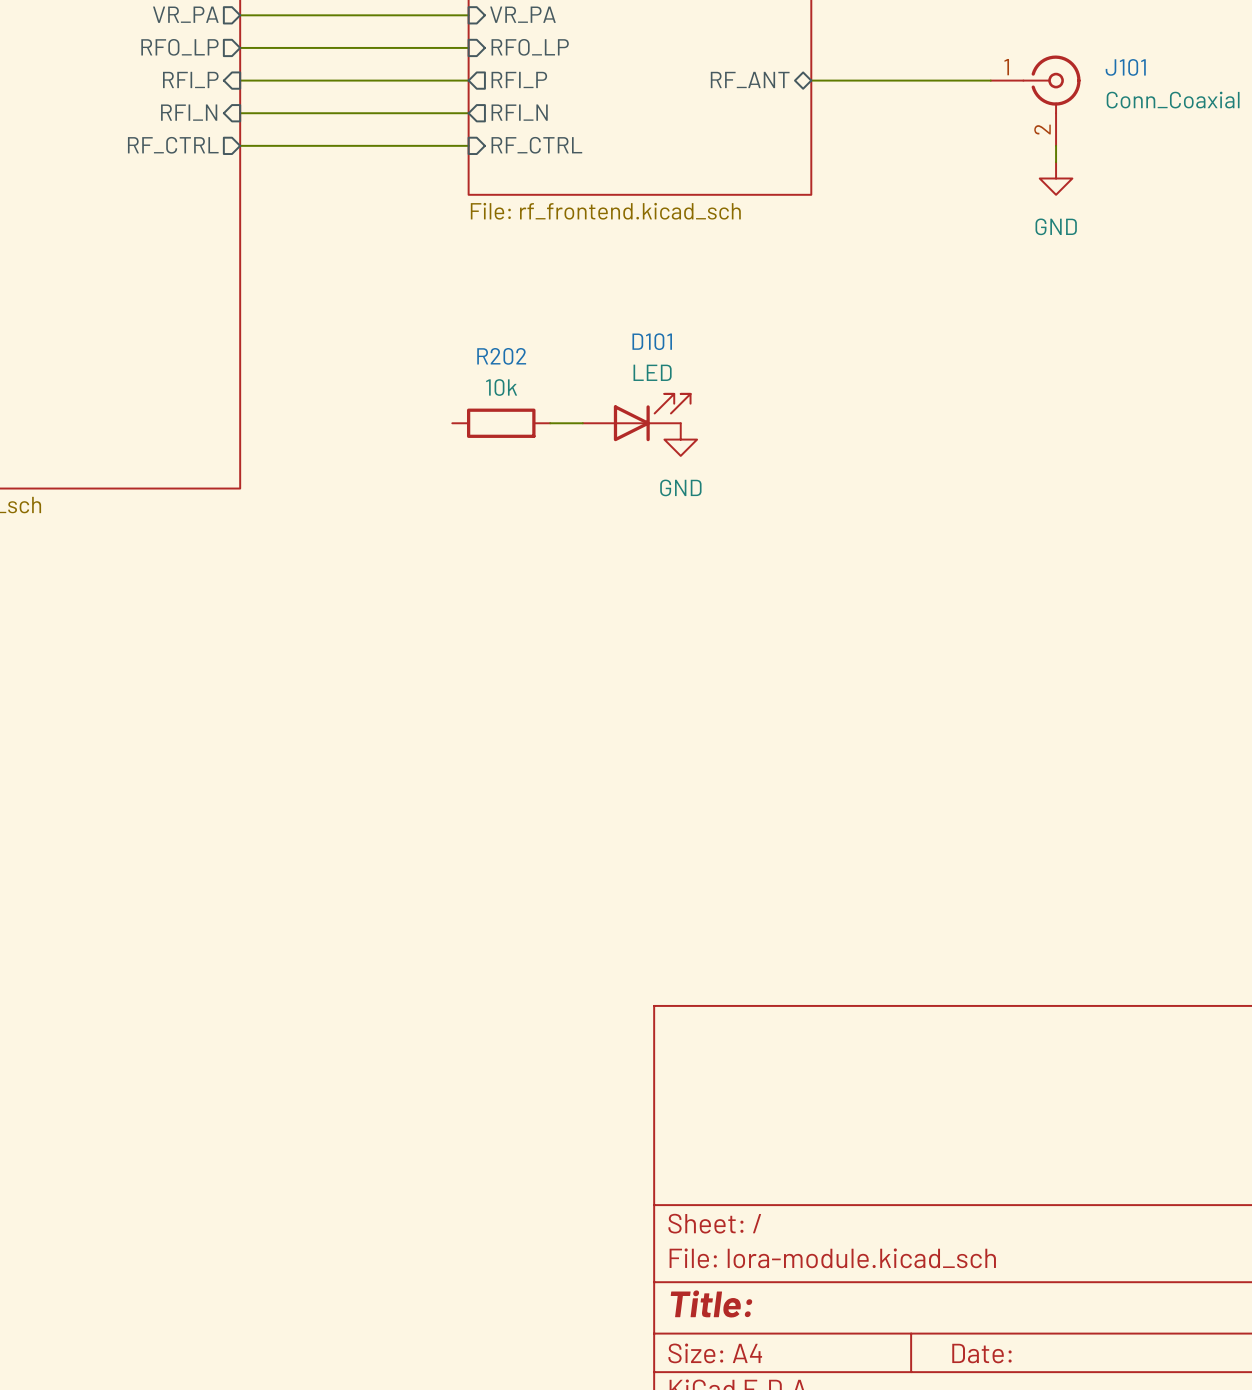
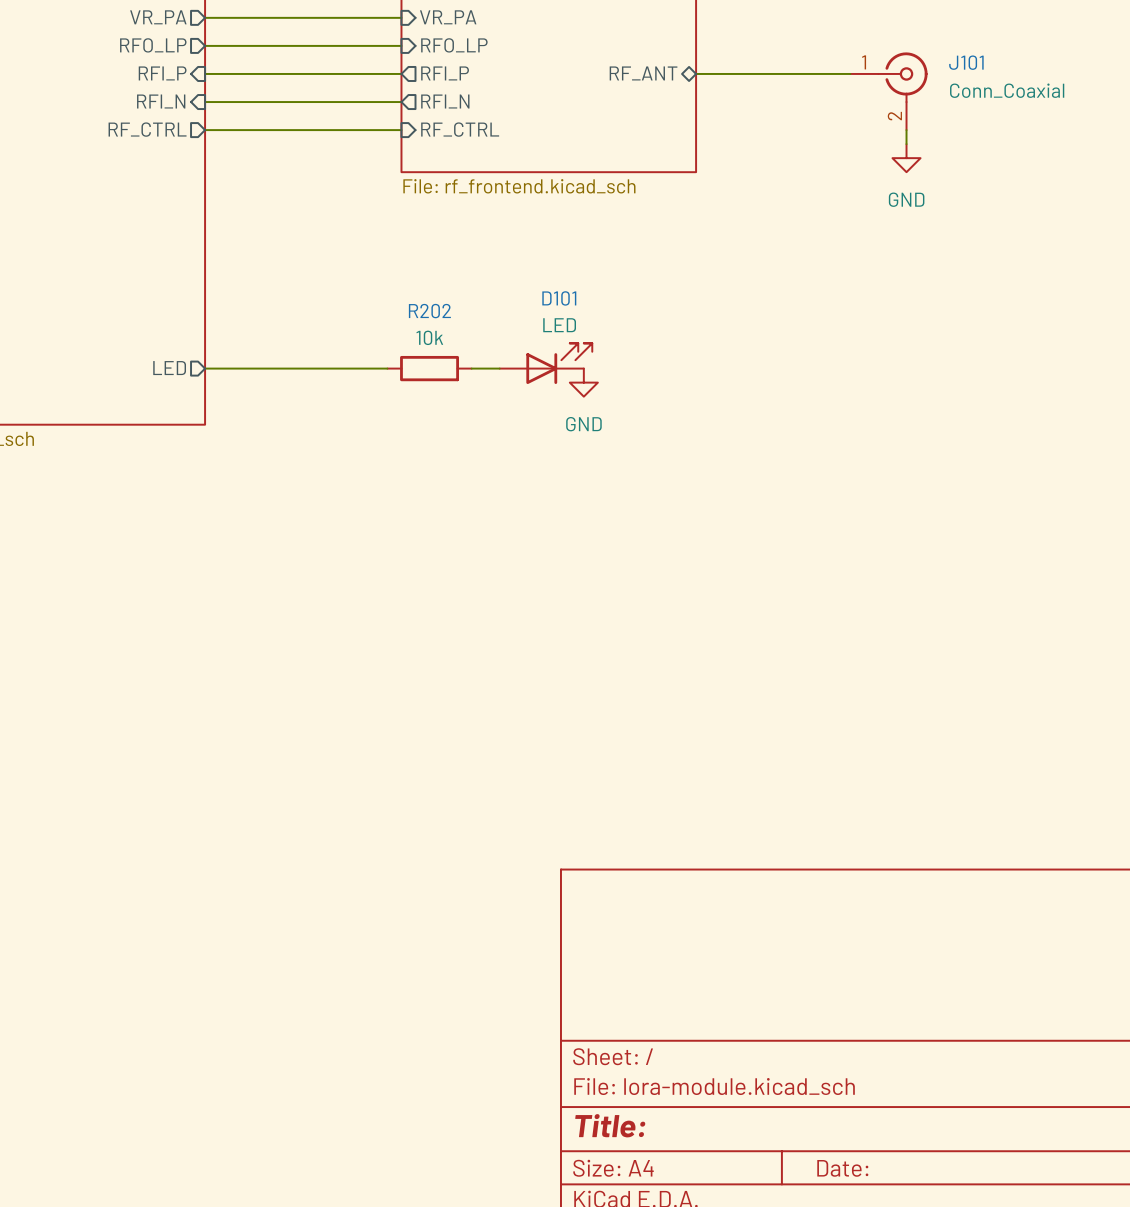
sheet pin: none -> LED (169, 368)
wire: none -> (205, 368) (387, 368)

